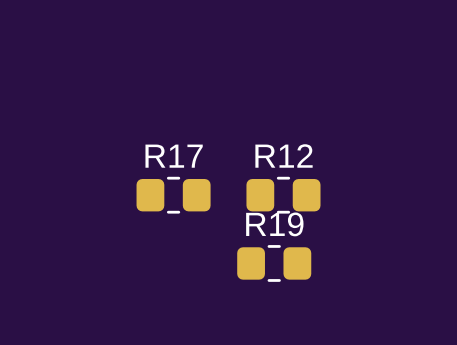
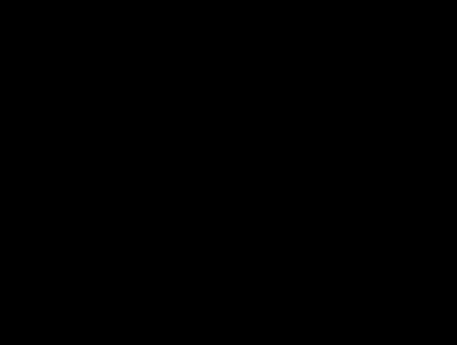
R17: (173, 195) -> none
R12: (283, 195) -> none
R19: (274, 263) -> none

